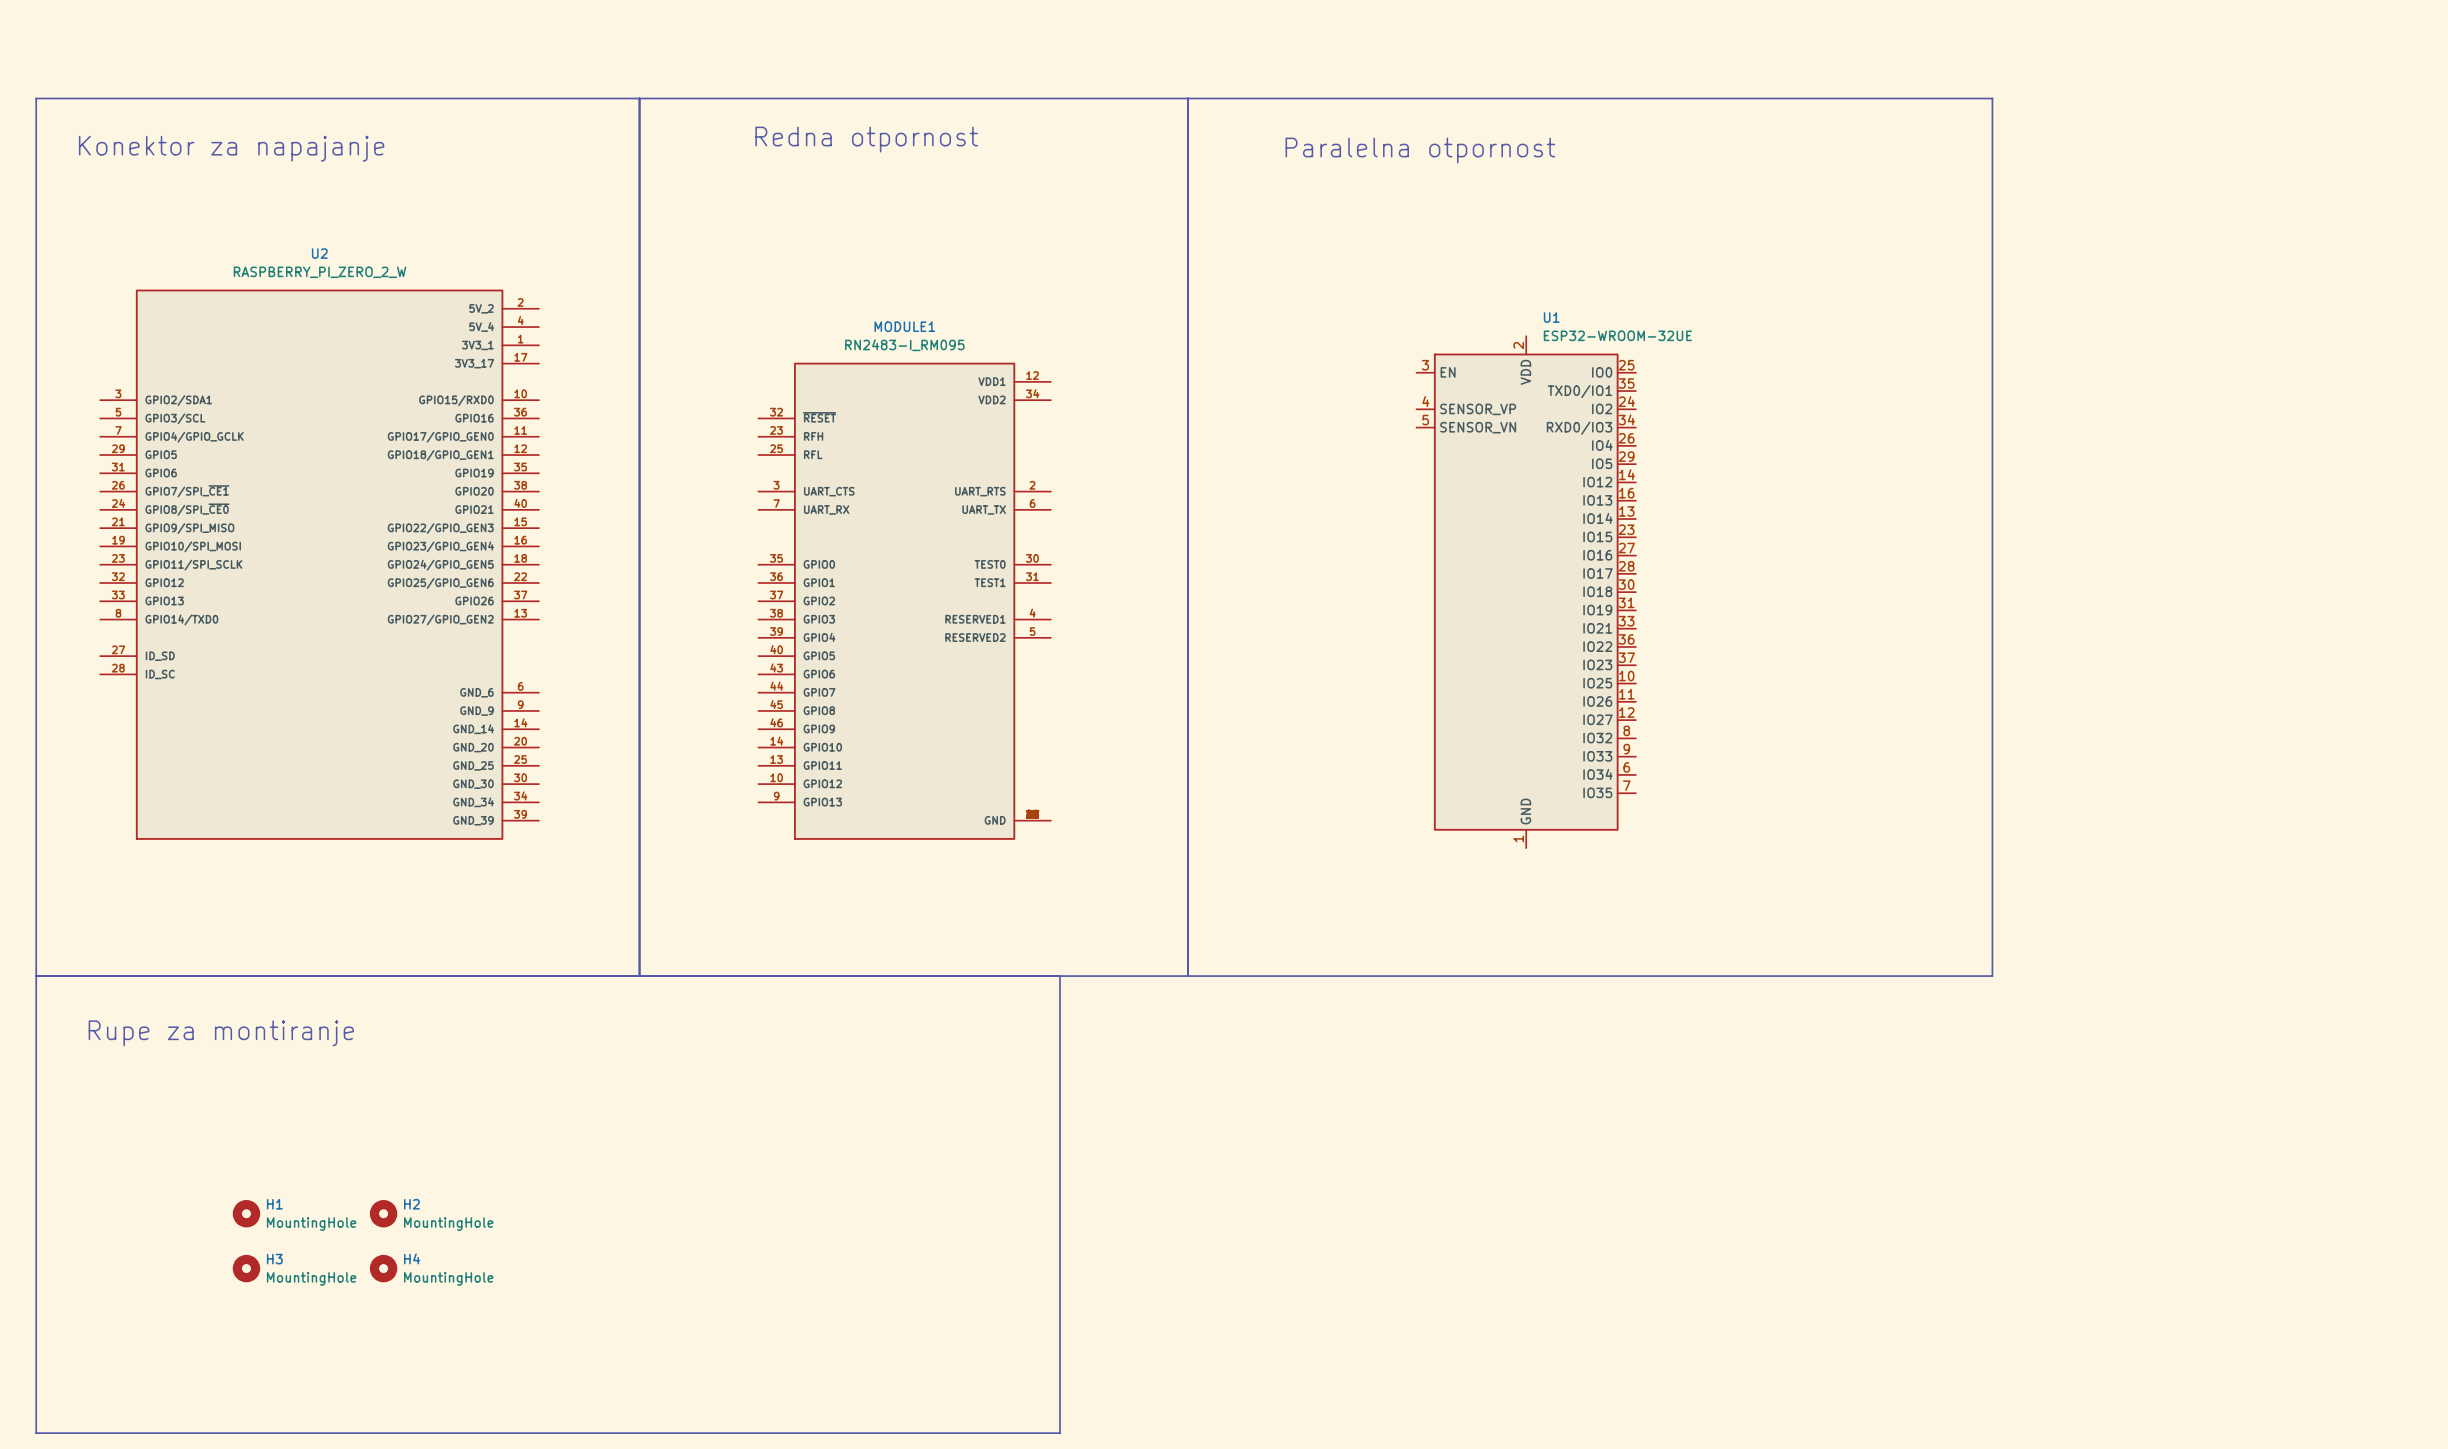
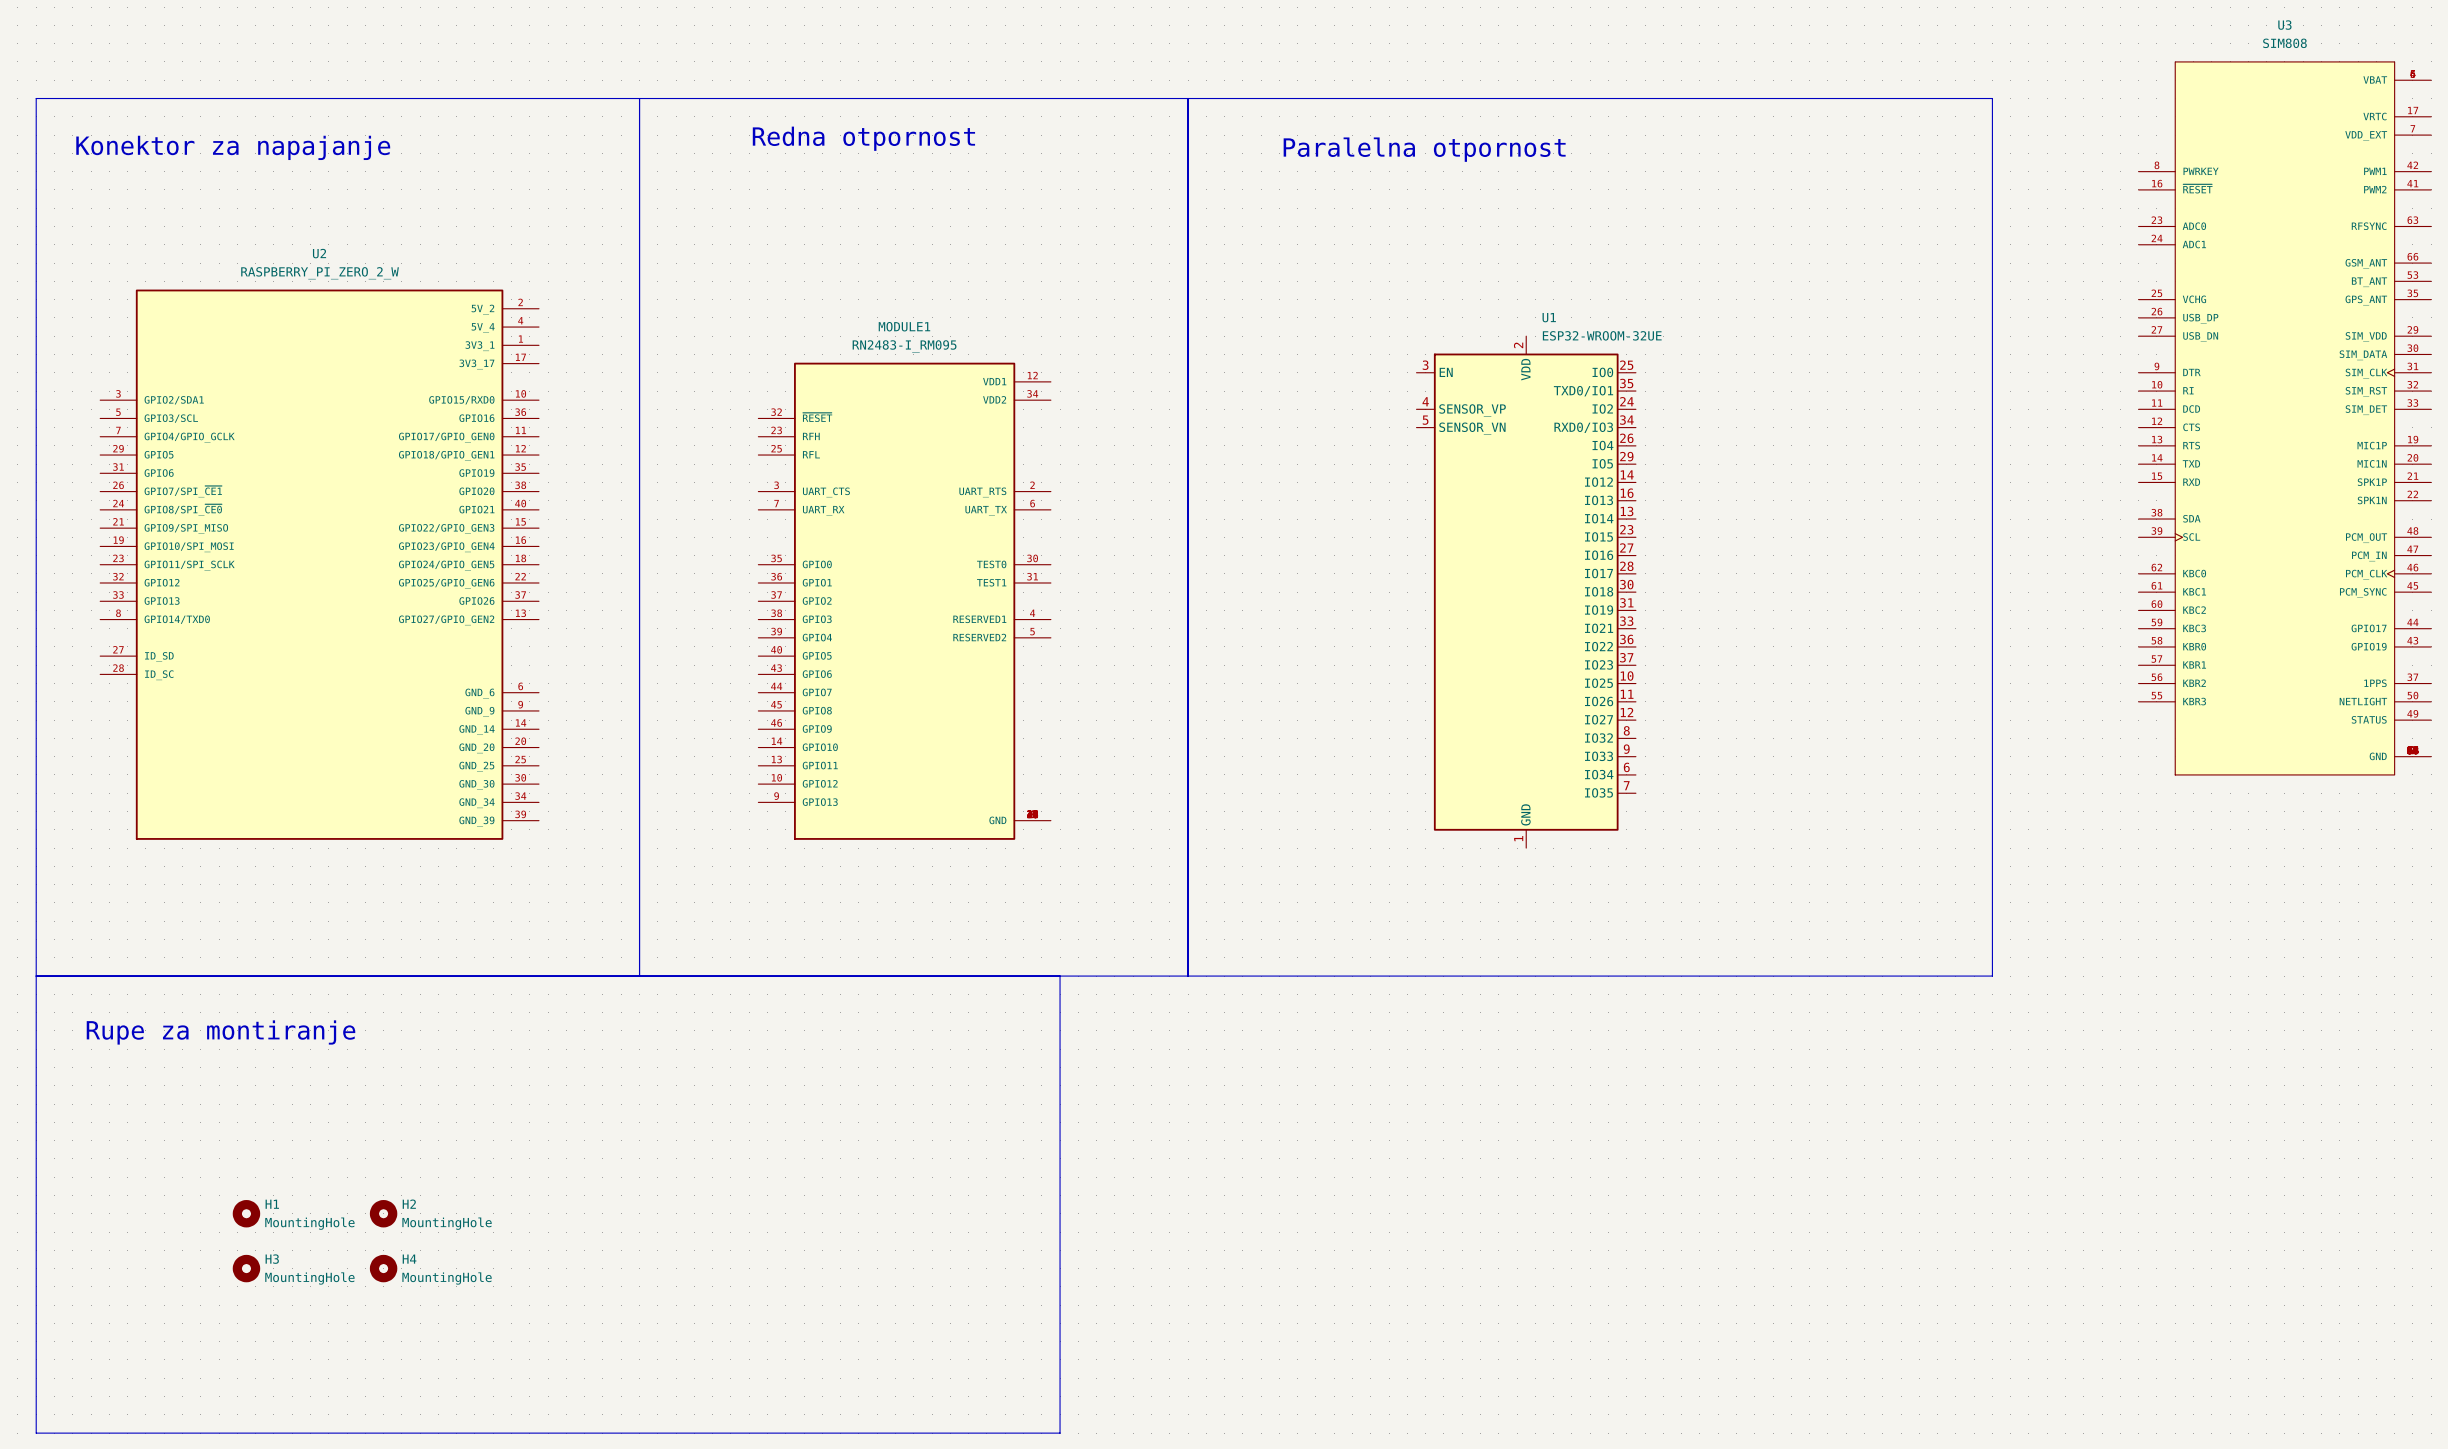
U3: none -> SIM808 (2284, 418)

